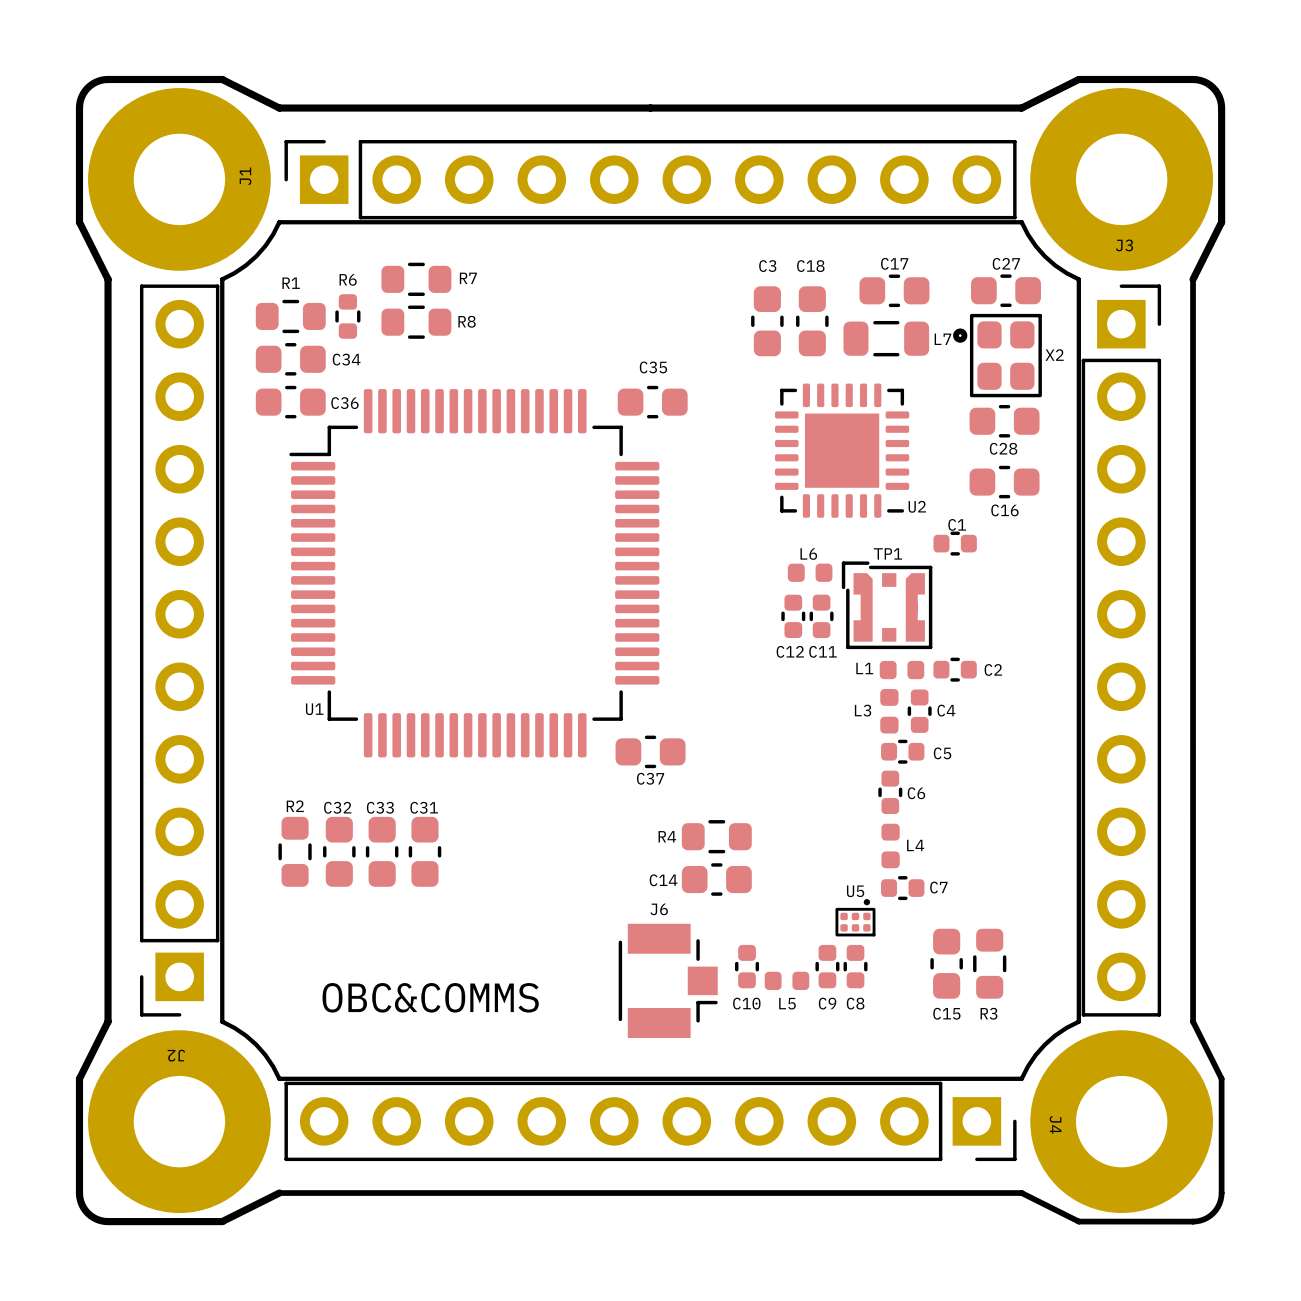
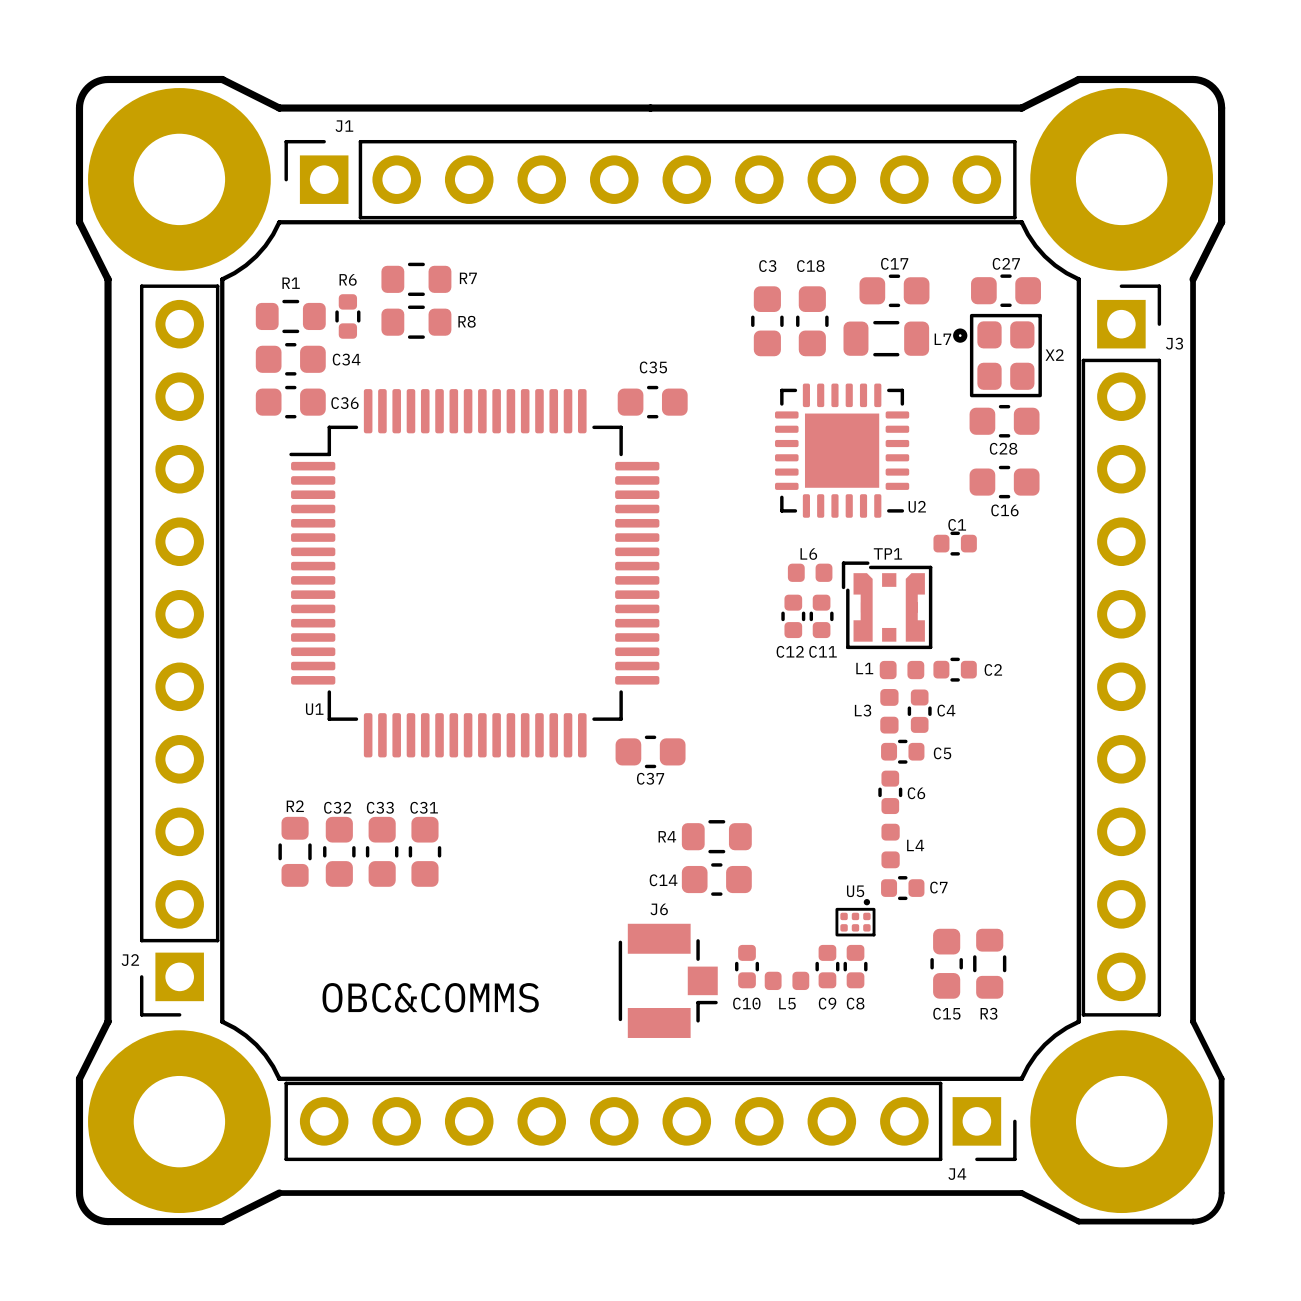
J1 name rotation: 0° (245, 176) -> 90° clockwise (344, 126)
J1 name position: J1 (245, 176) -> J1 (344, 126)
J3 name position: J3 (1124, 245) -> J3 (1174, 343)
J2 name rotation: 0° (176, 1055) -> 180° (130, 960)
J2 name position: J2 (176, 1055) -> J2 (130, 960)
J4 name rotation: 0° (1055, 1124) -> 90° counterclockwise (957, 1174)
J4 name position: J4 (1055, 1124) -> J4 (957, 1174)

